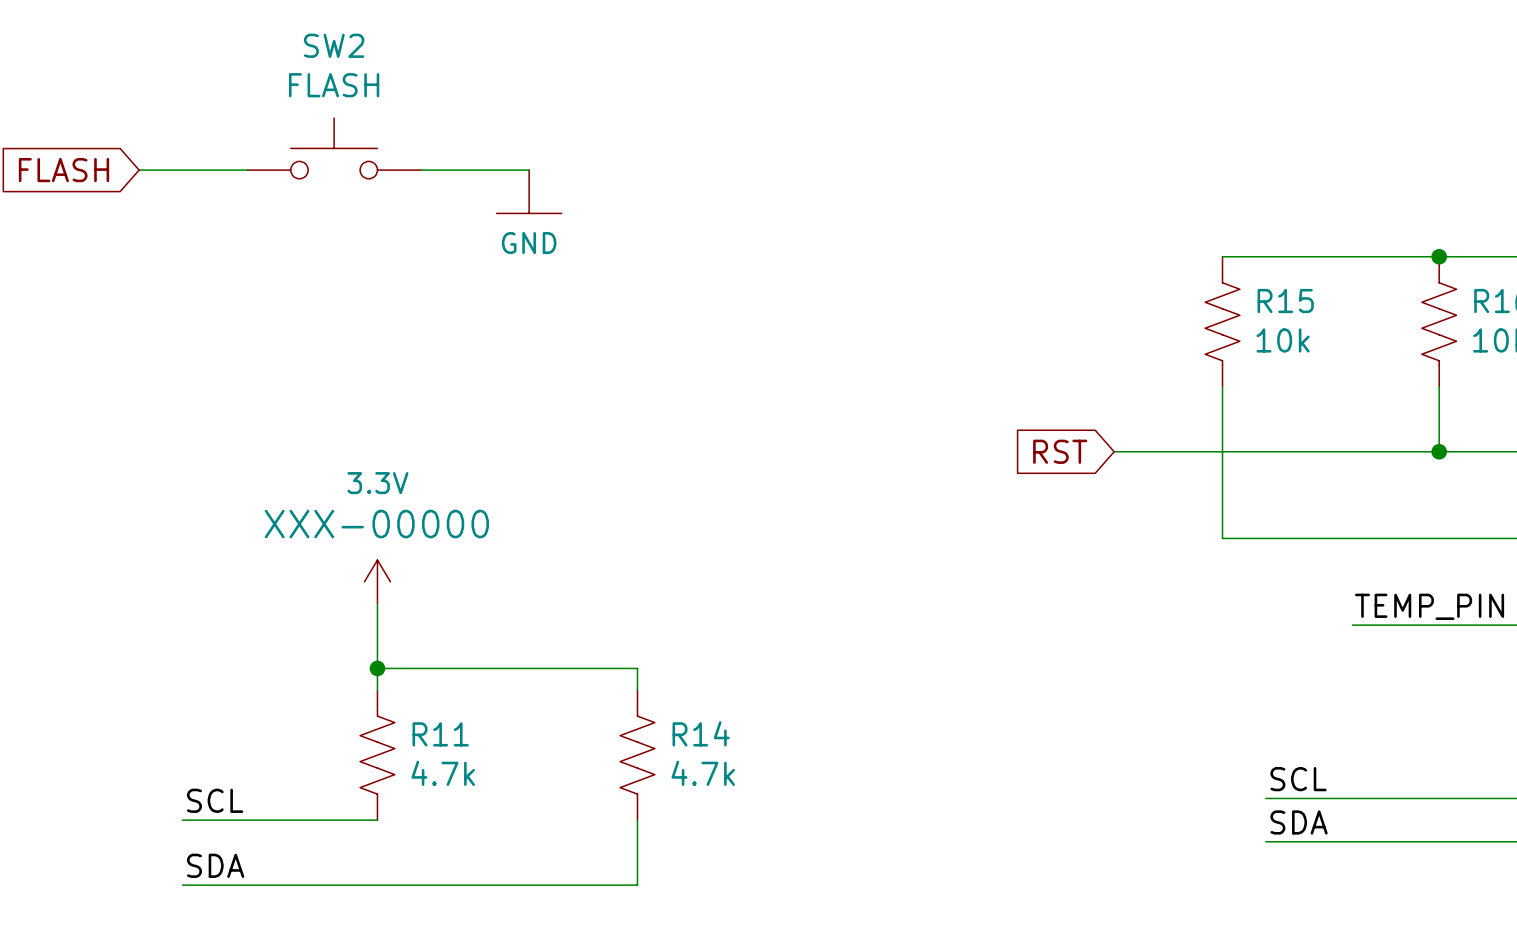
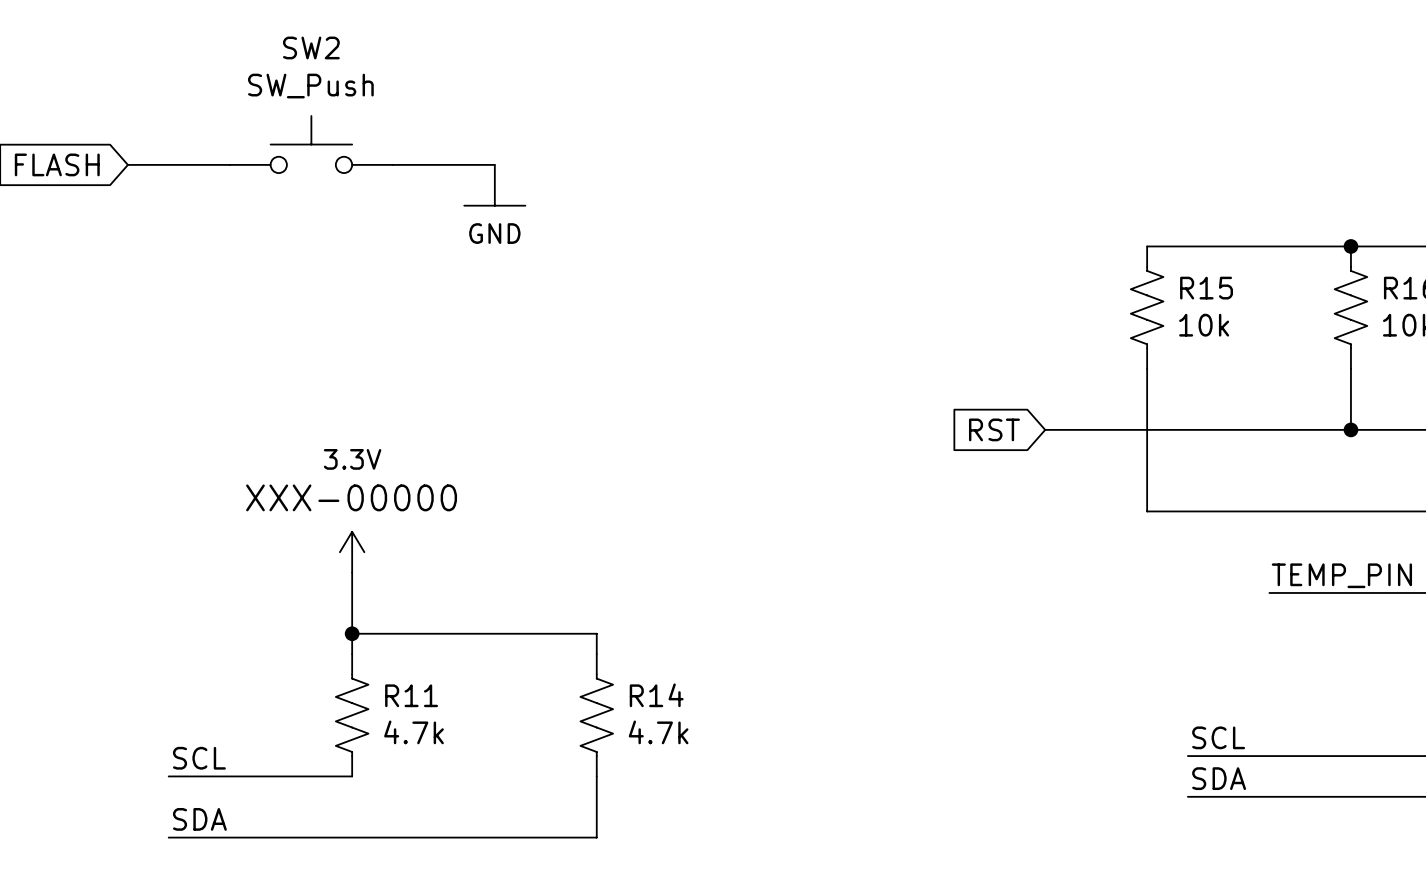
SW2 value: FLASH (334, 85) -> SW_Push (310, 86)

